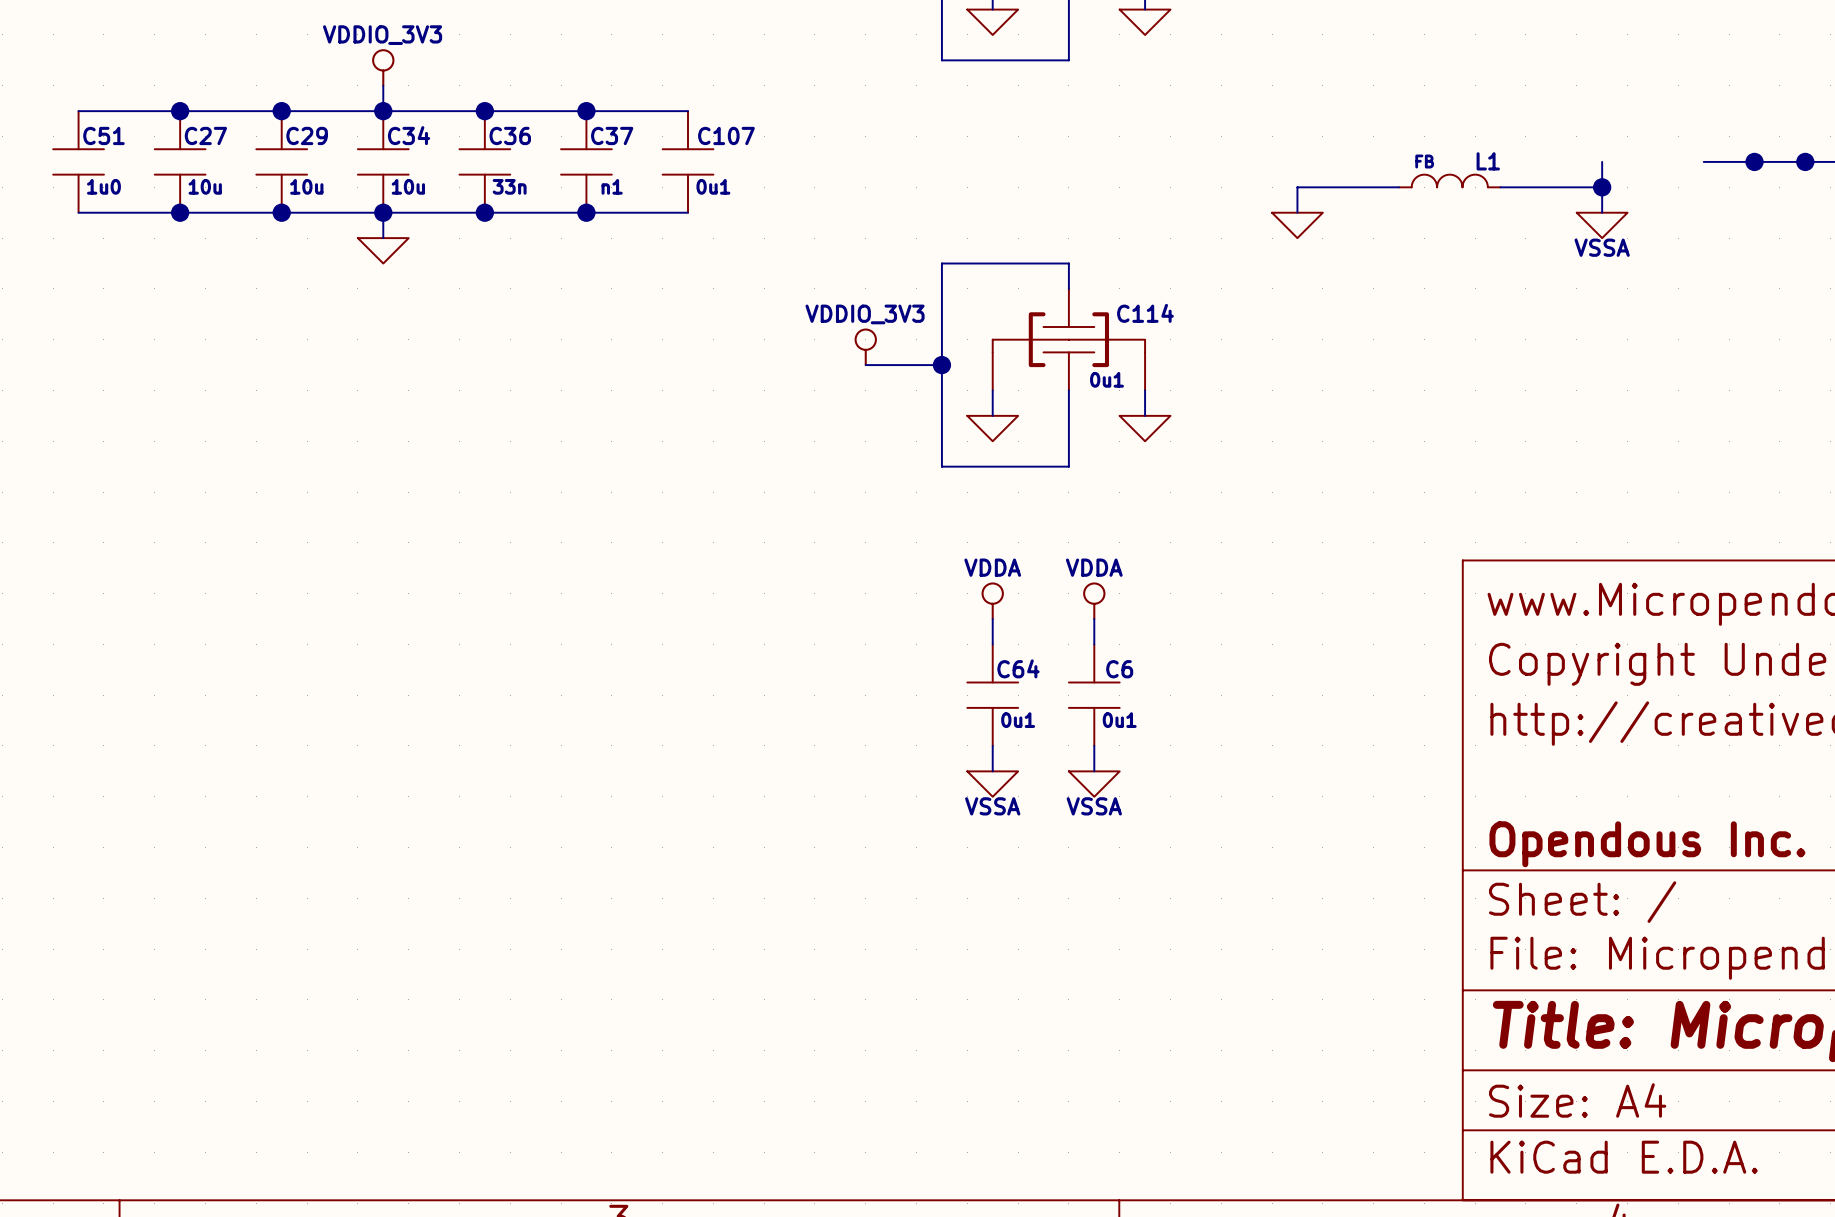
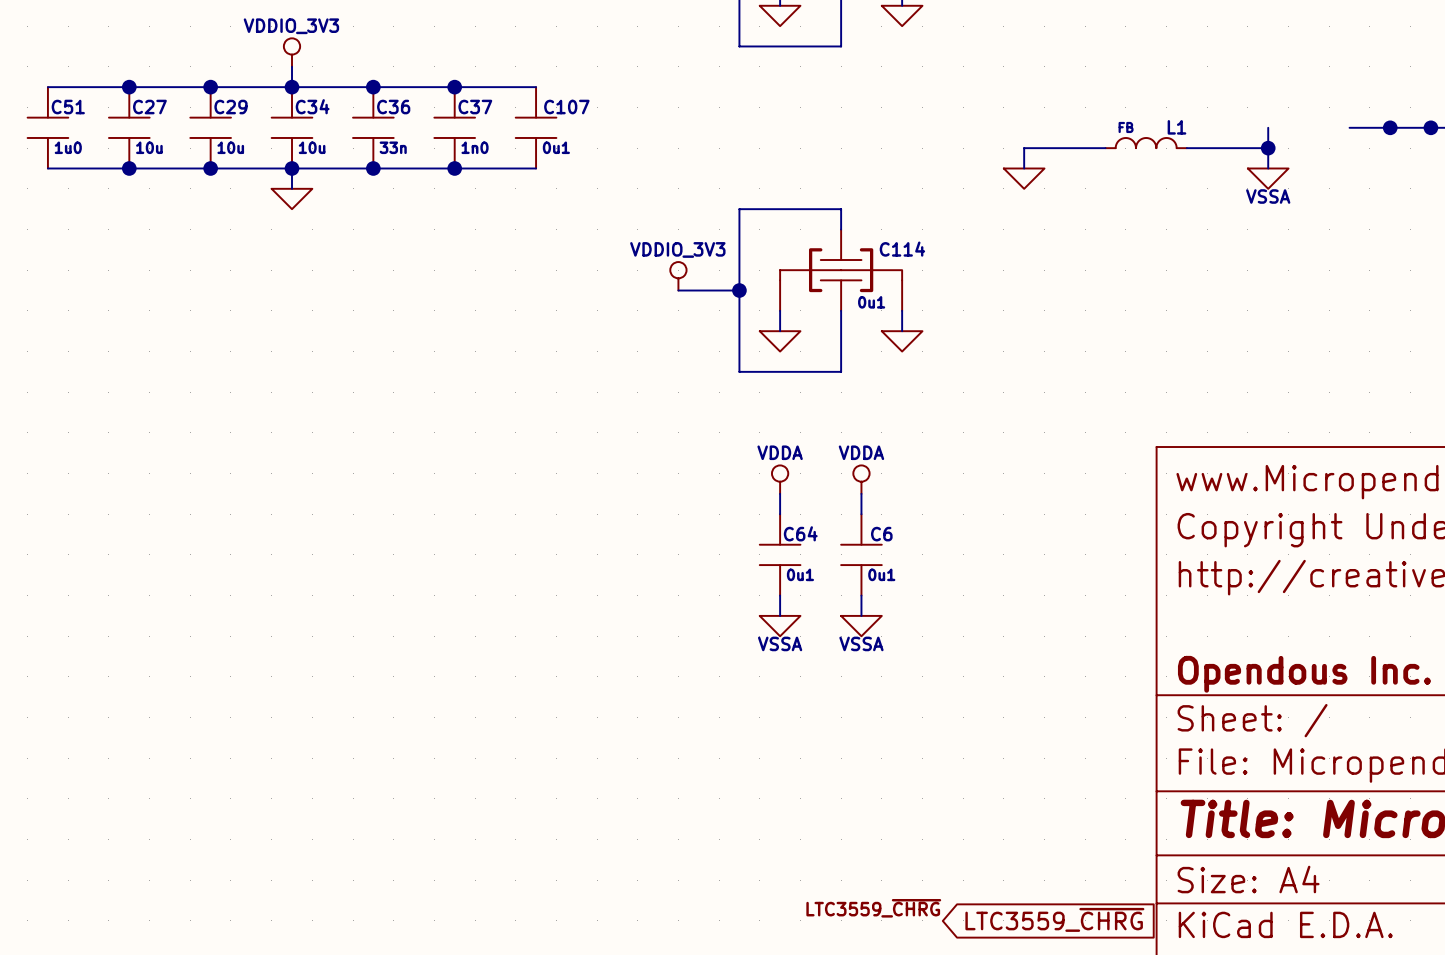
C37 value: n1 (612, 186) -> 1n0 (475, 147)
label: none -> LTC3559_~{CHRG} (873, 908)
global label: none -> LTC3559_~{CHRG} (1054, 919)

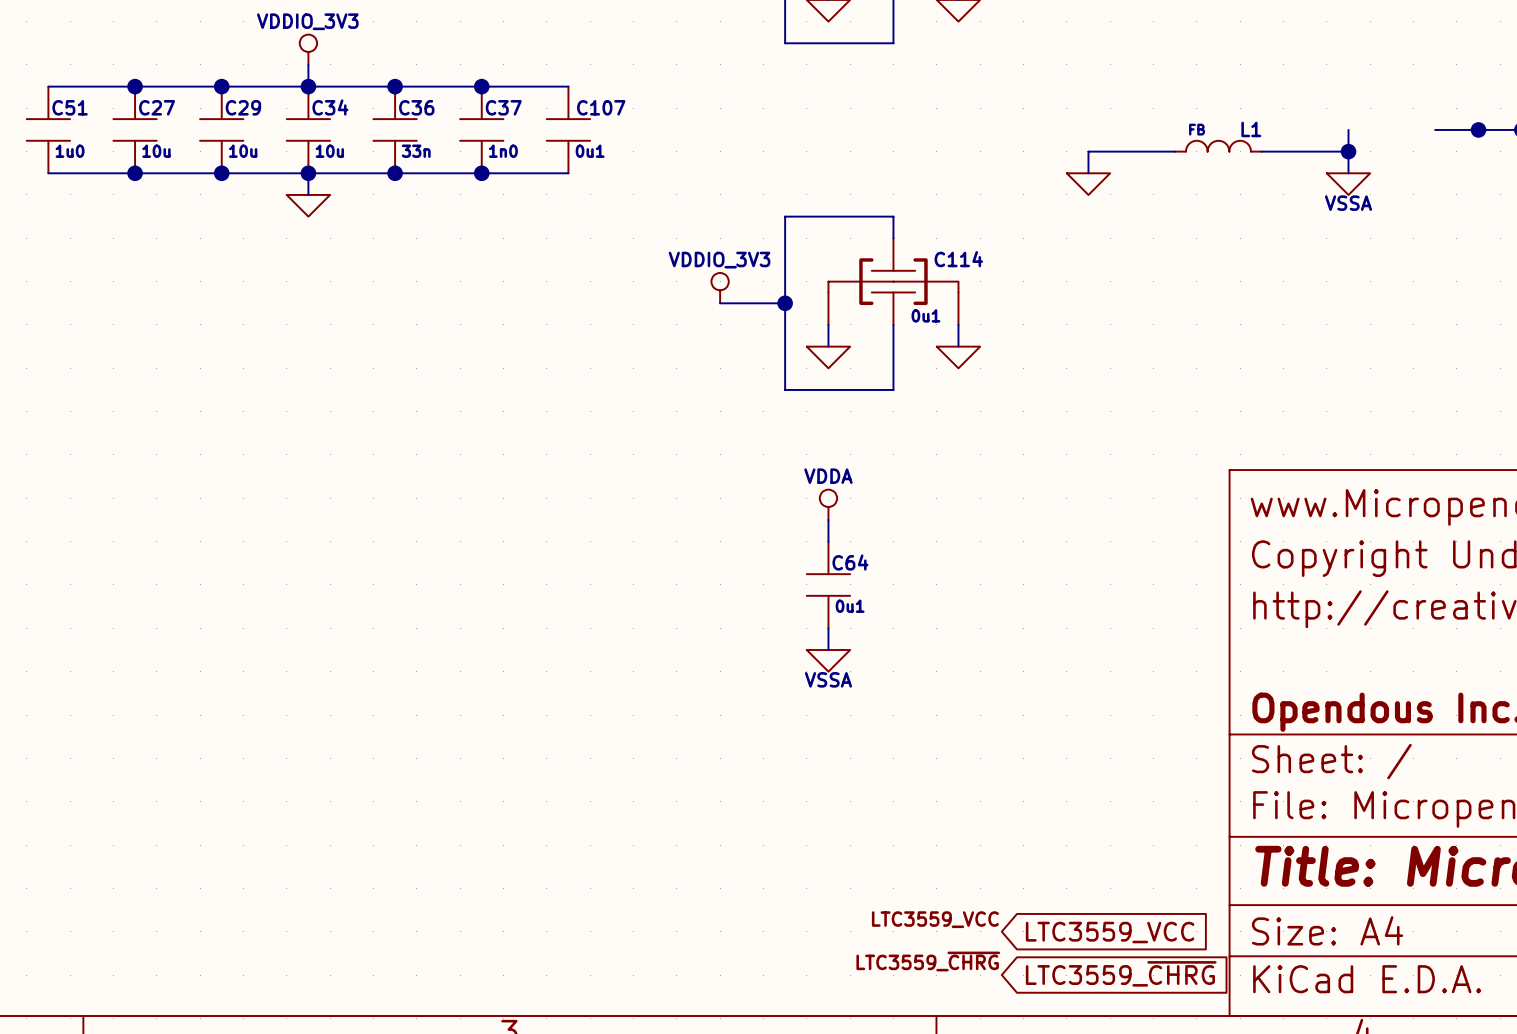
power symbol: VDDA (861, 479) -> none
wire: (861, 493) (861, 514) -> none
C6: 0u1 (861, 554) -> none
wire: (861, 595) (861, 615) -> none
power symbol: VSSA (861, 626) -> none
label: none -> LTC3559_VCC (935, 919)
global label: none -> LTC3559_VCC (1110, 932)

